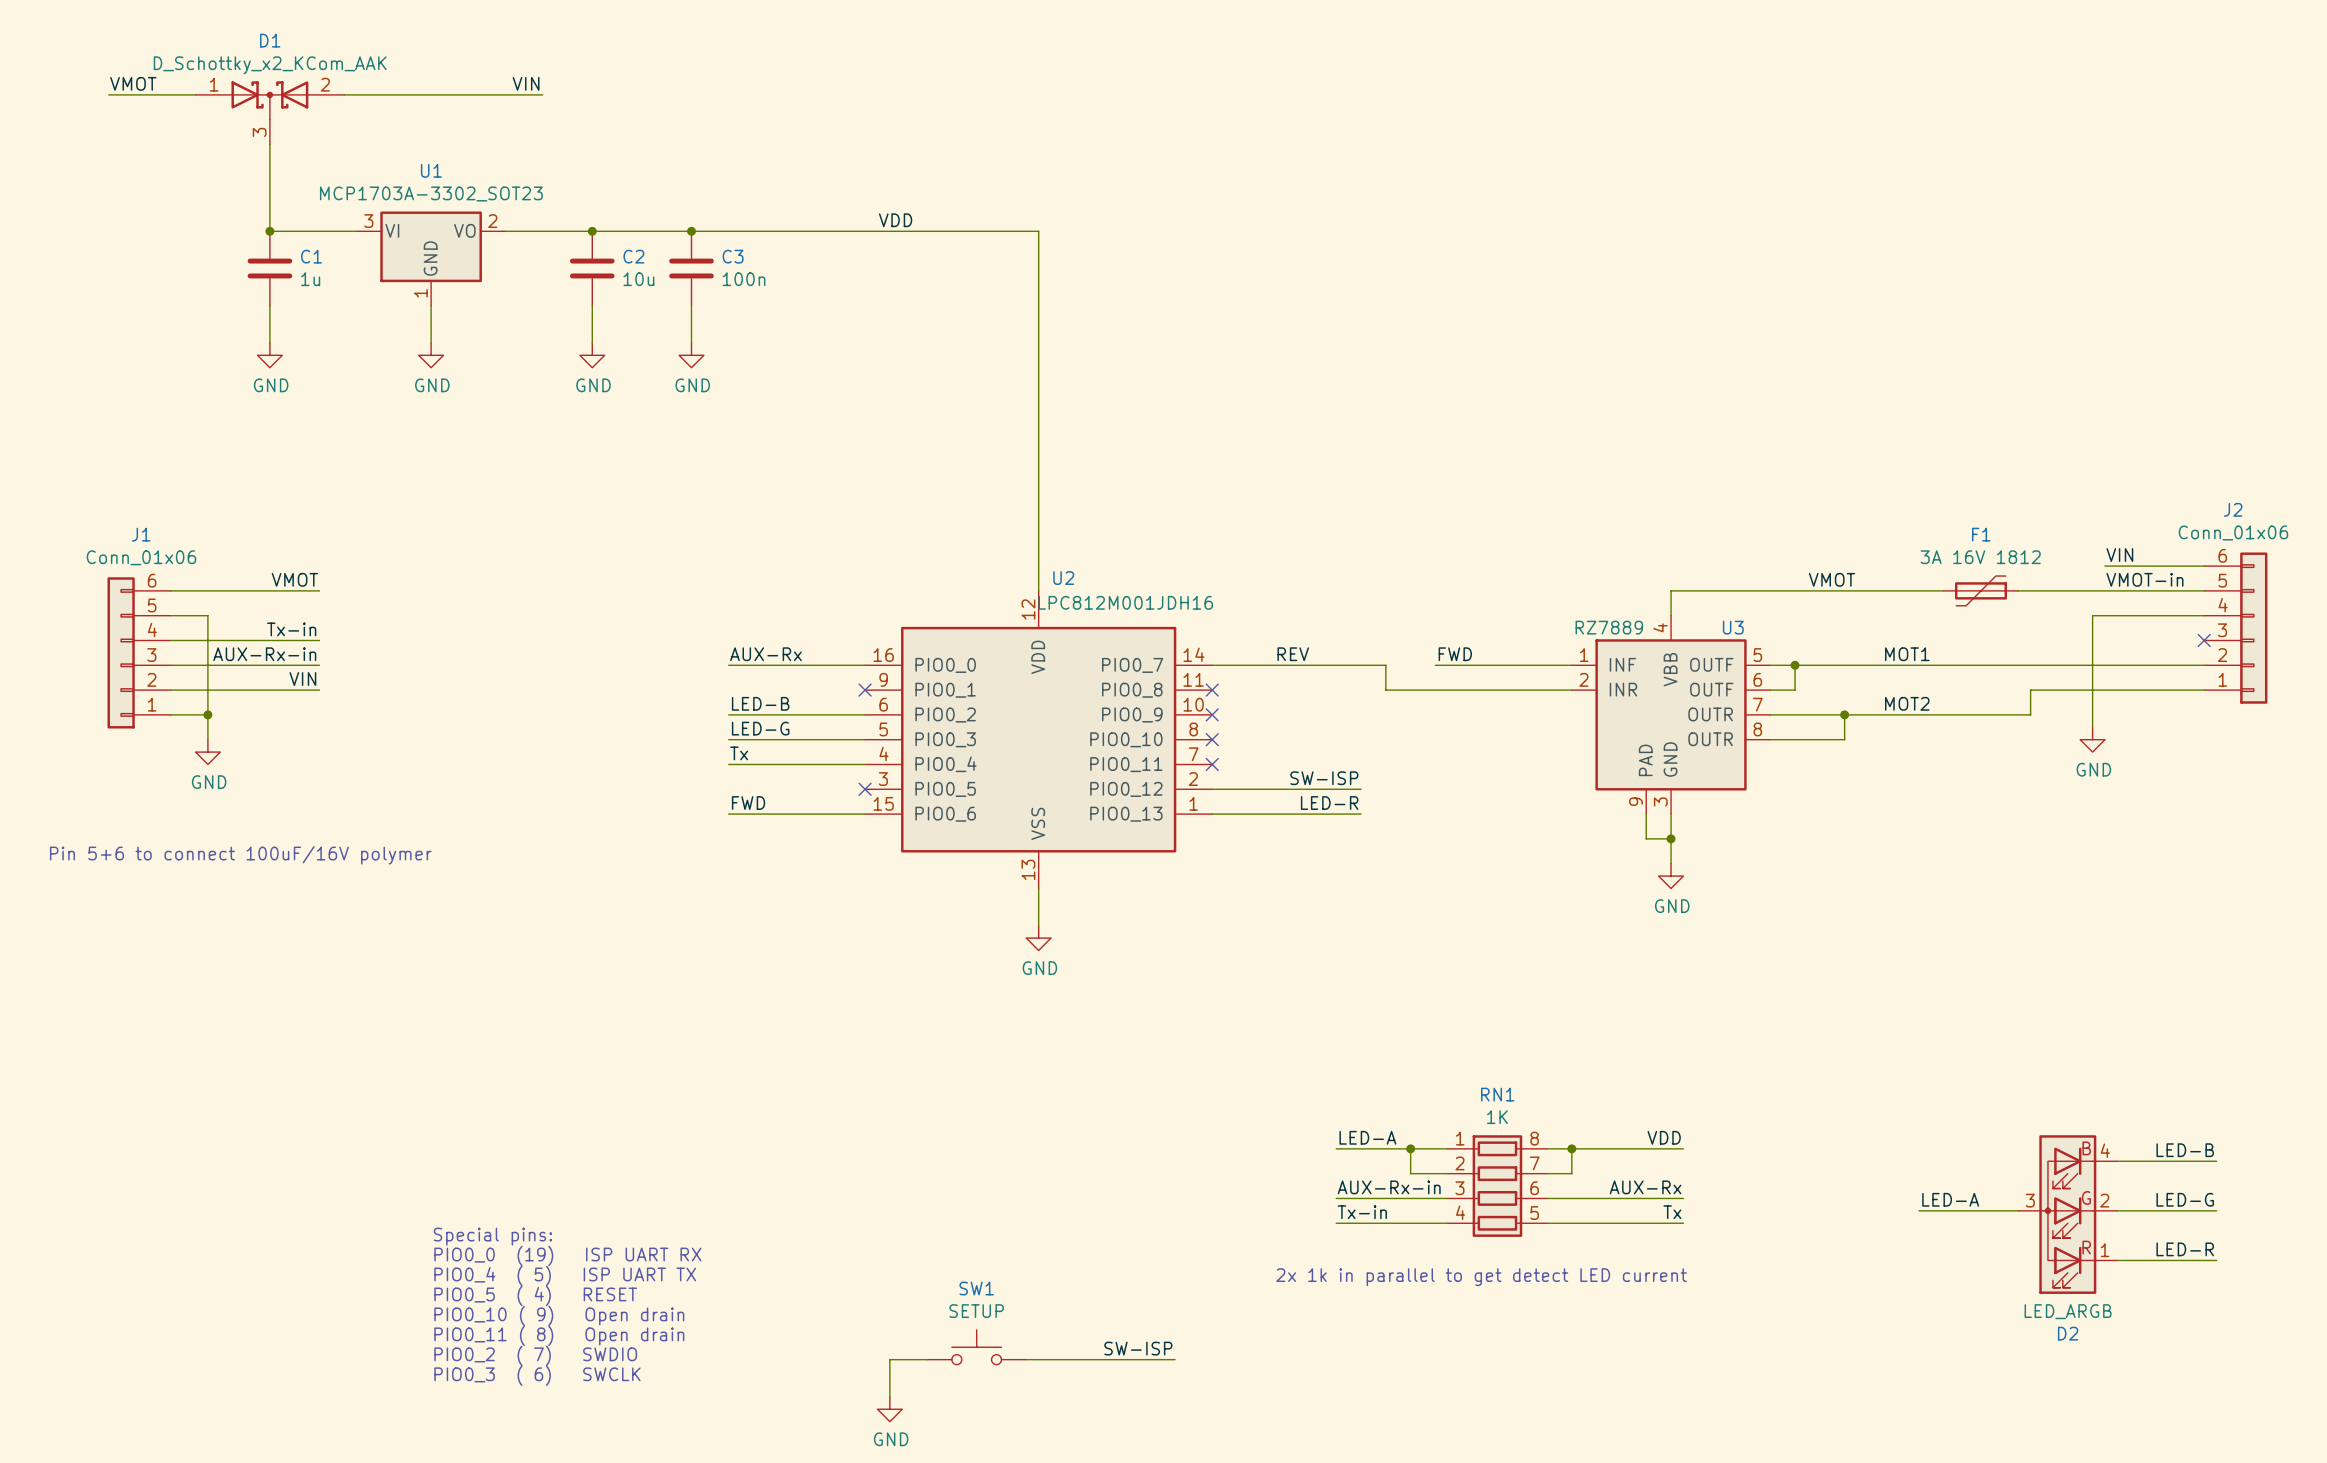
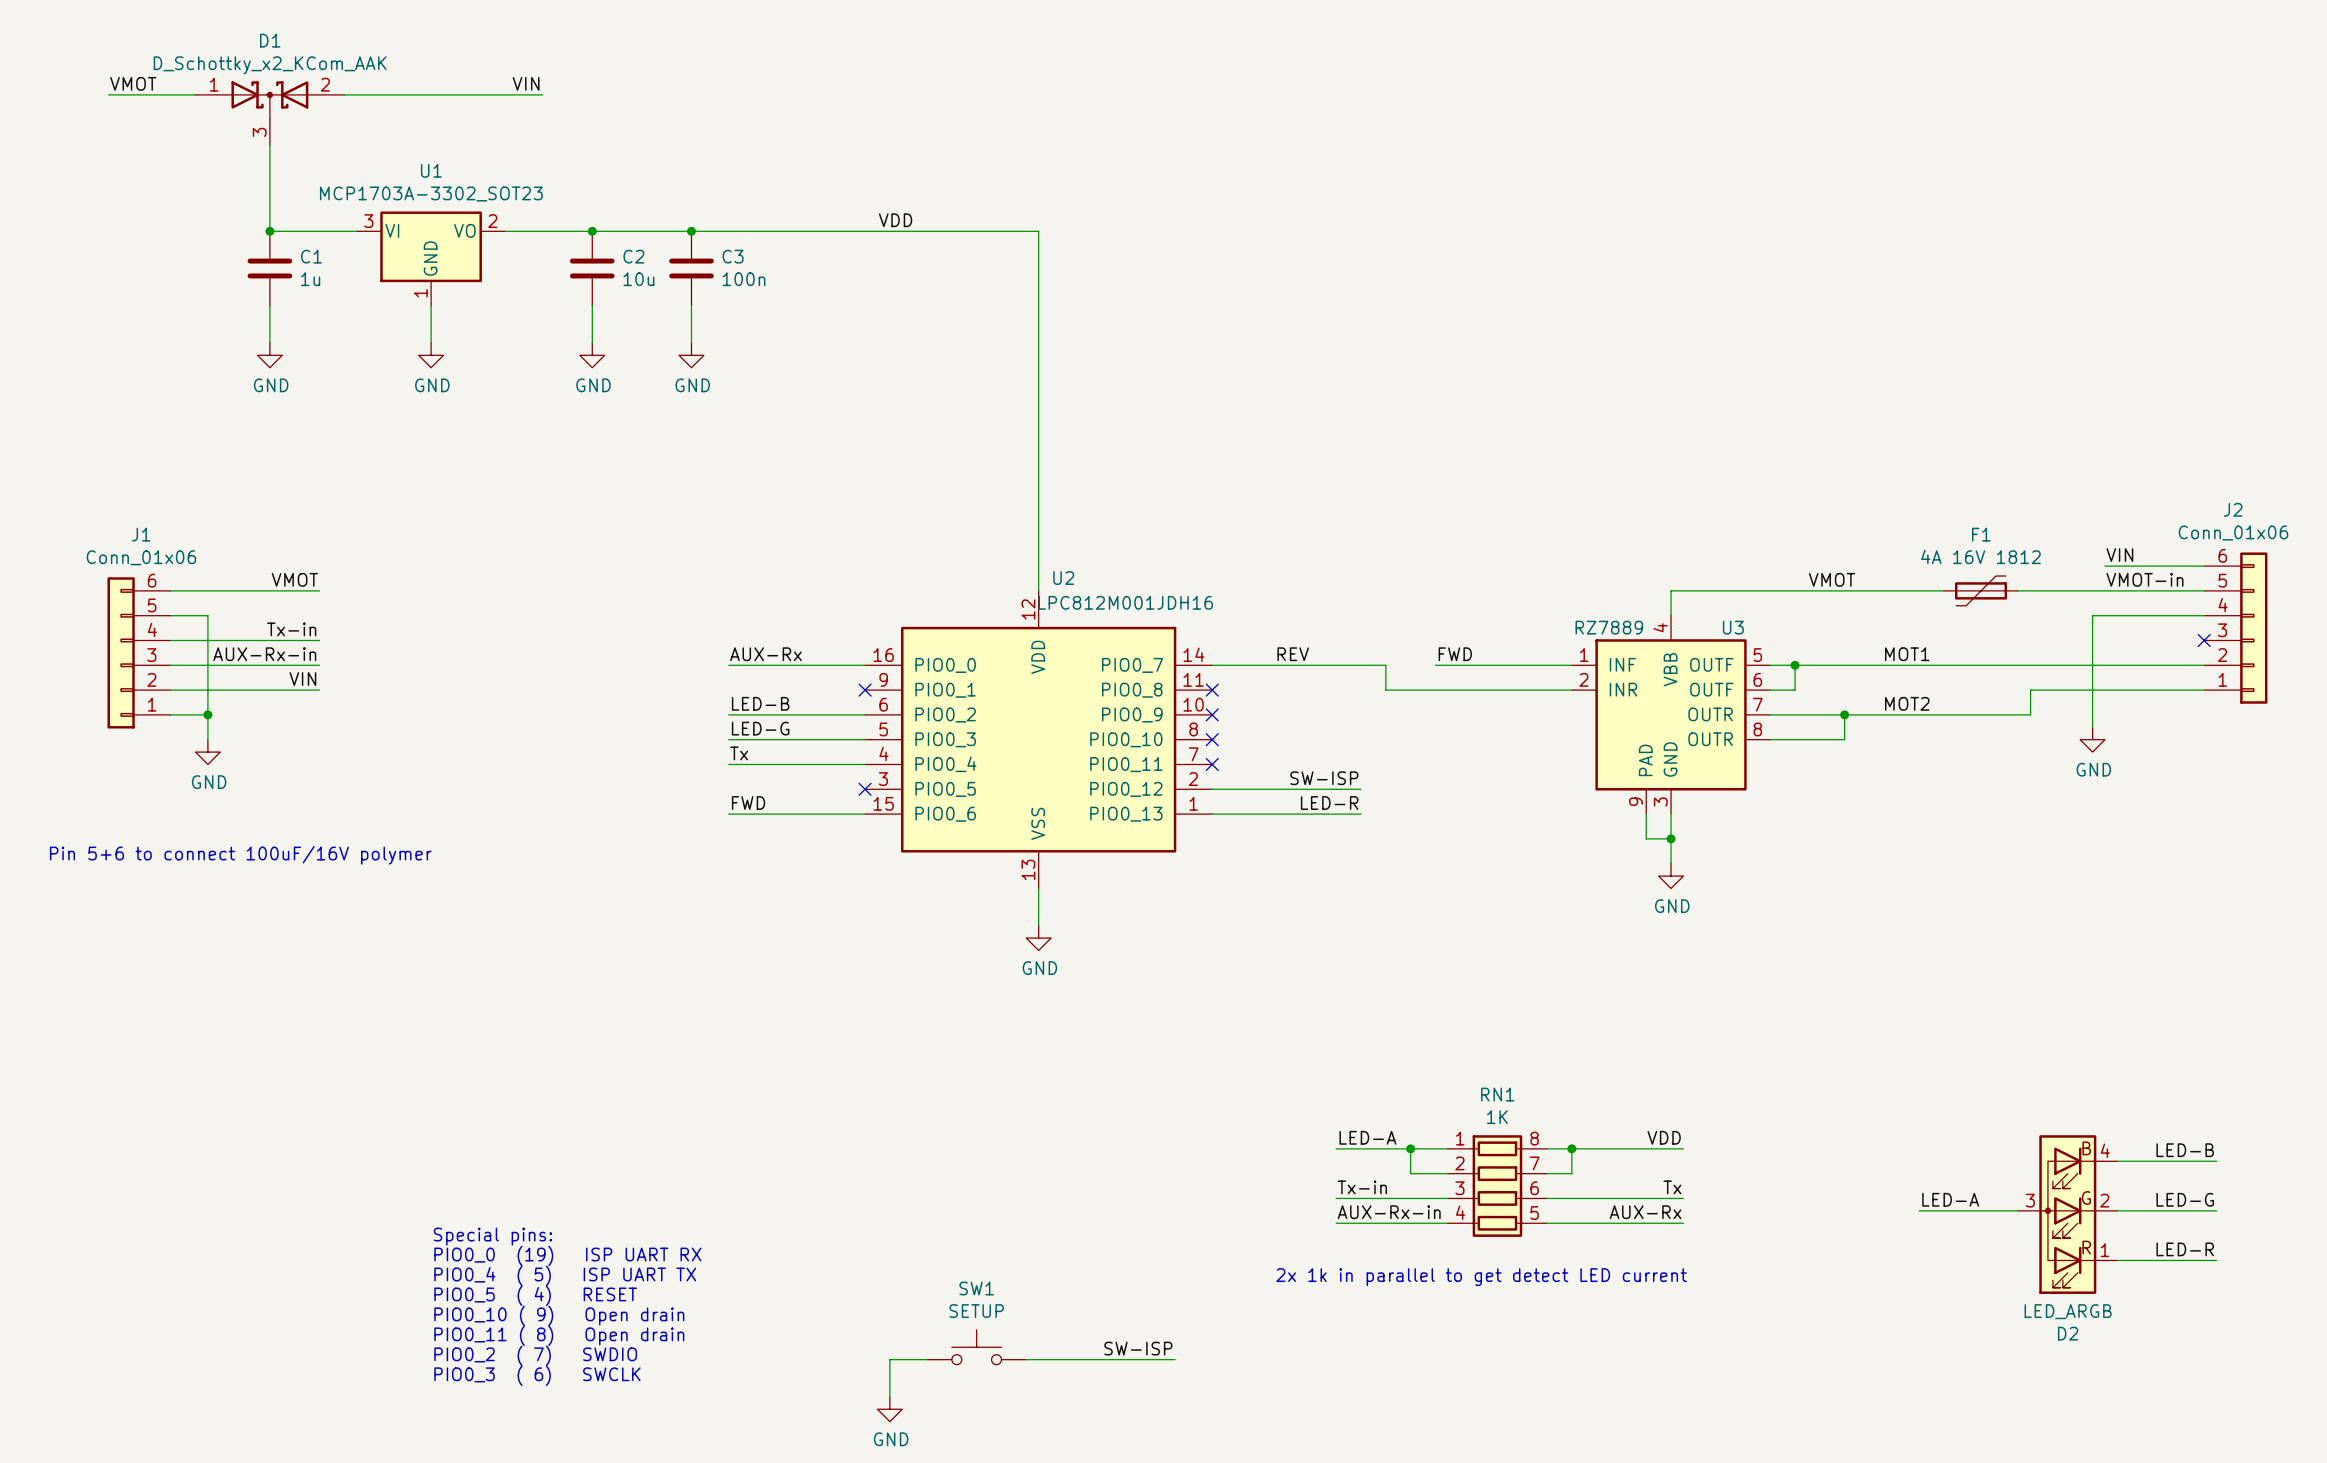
F1 value: 3A 16V 1812 (1980, 557) -> 4A 16V 1812 (1981, 556)
label: AUX-Rx-in (1389, 1187) -> Tx-in (1362, 1187)
label: AUX-Rx (1645, 1187) -> Tx (1672, 1187)
label: Tx-in (1362, 1212) -> AUX-Rx-in (1389, 1212)
label: Tx (1672, 1212) -> AUX-Rx (1645, 1212)

